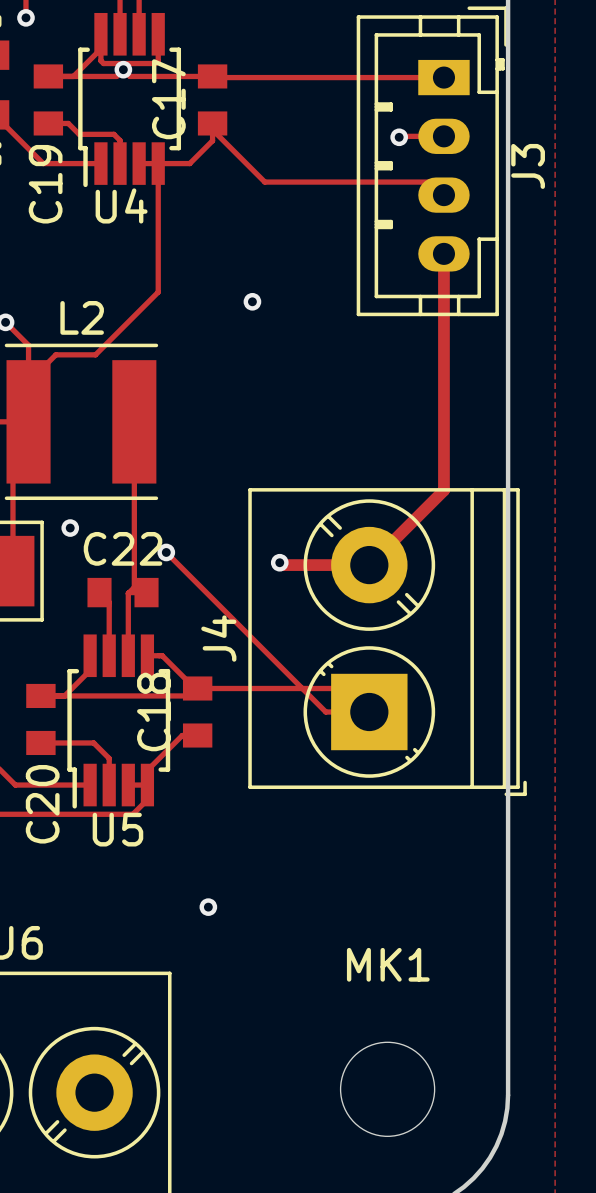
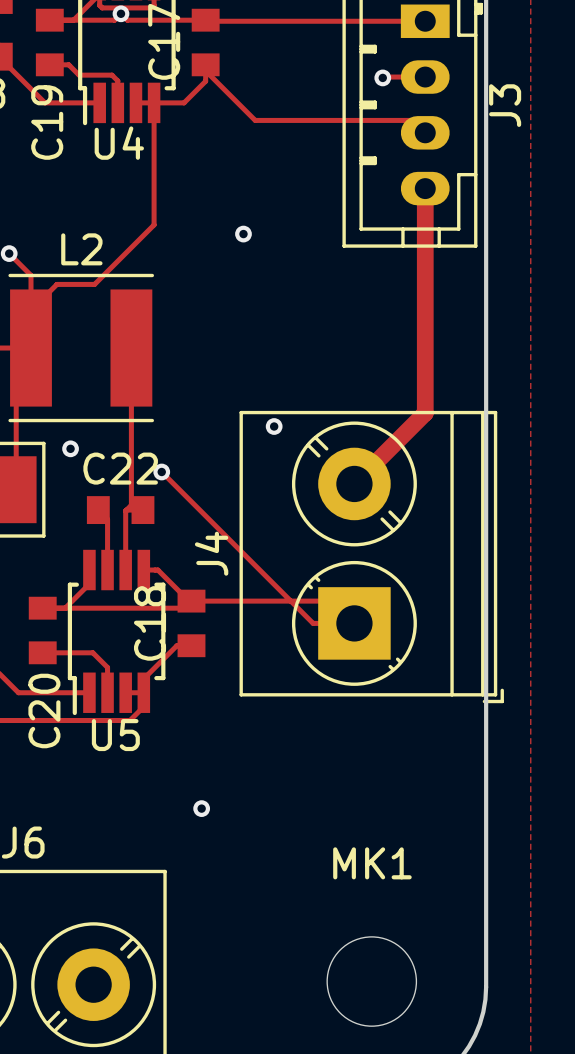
track width: thin (443, 253) (443, 490) (369, 565) -> thick (425, 188) (425, 413) (354, 483)
track: (279, 562) (282, 565) (369, 565) -> none
via position: (279, 562) -> (274, 426)

